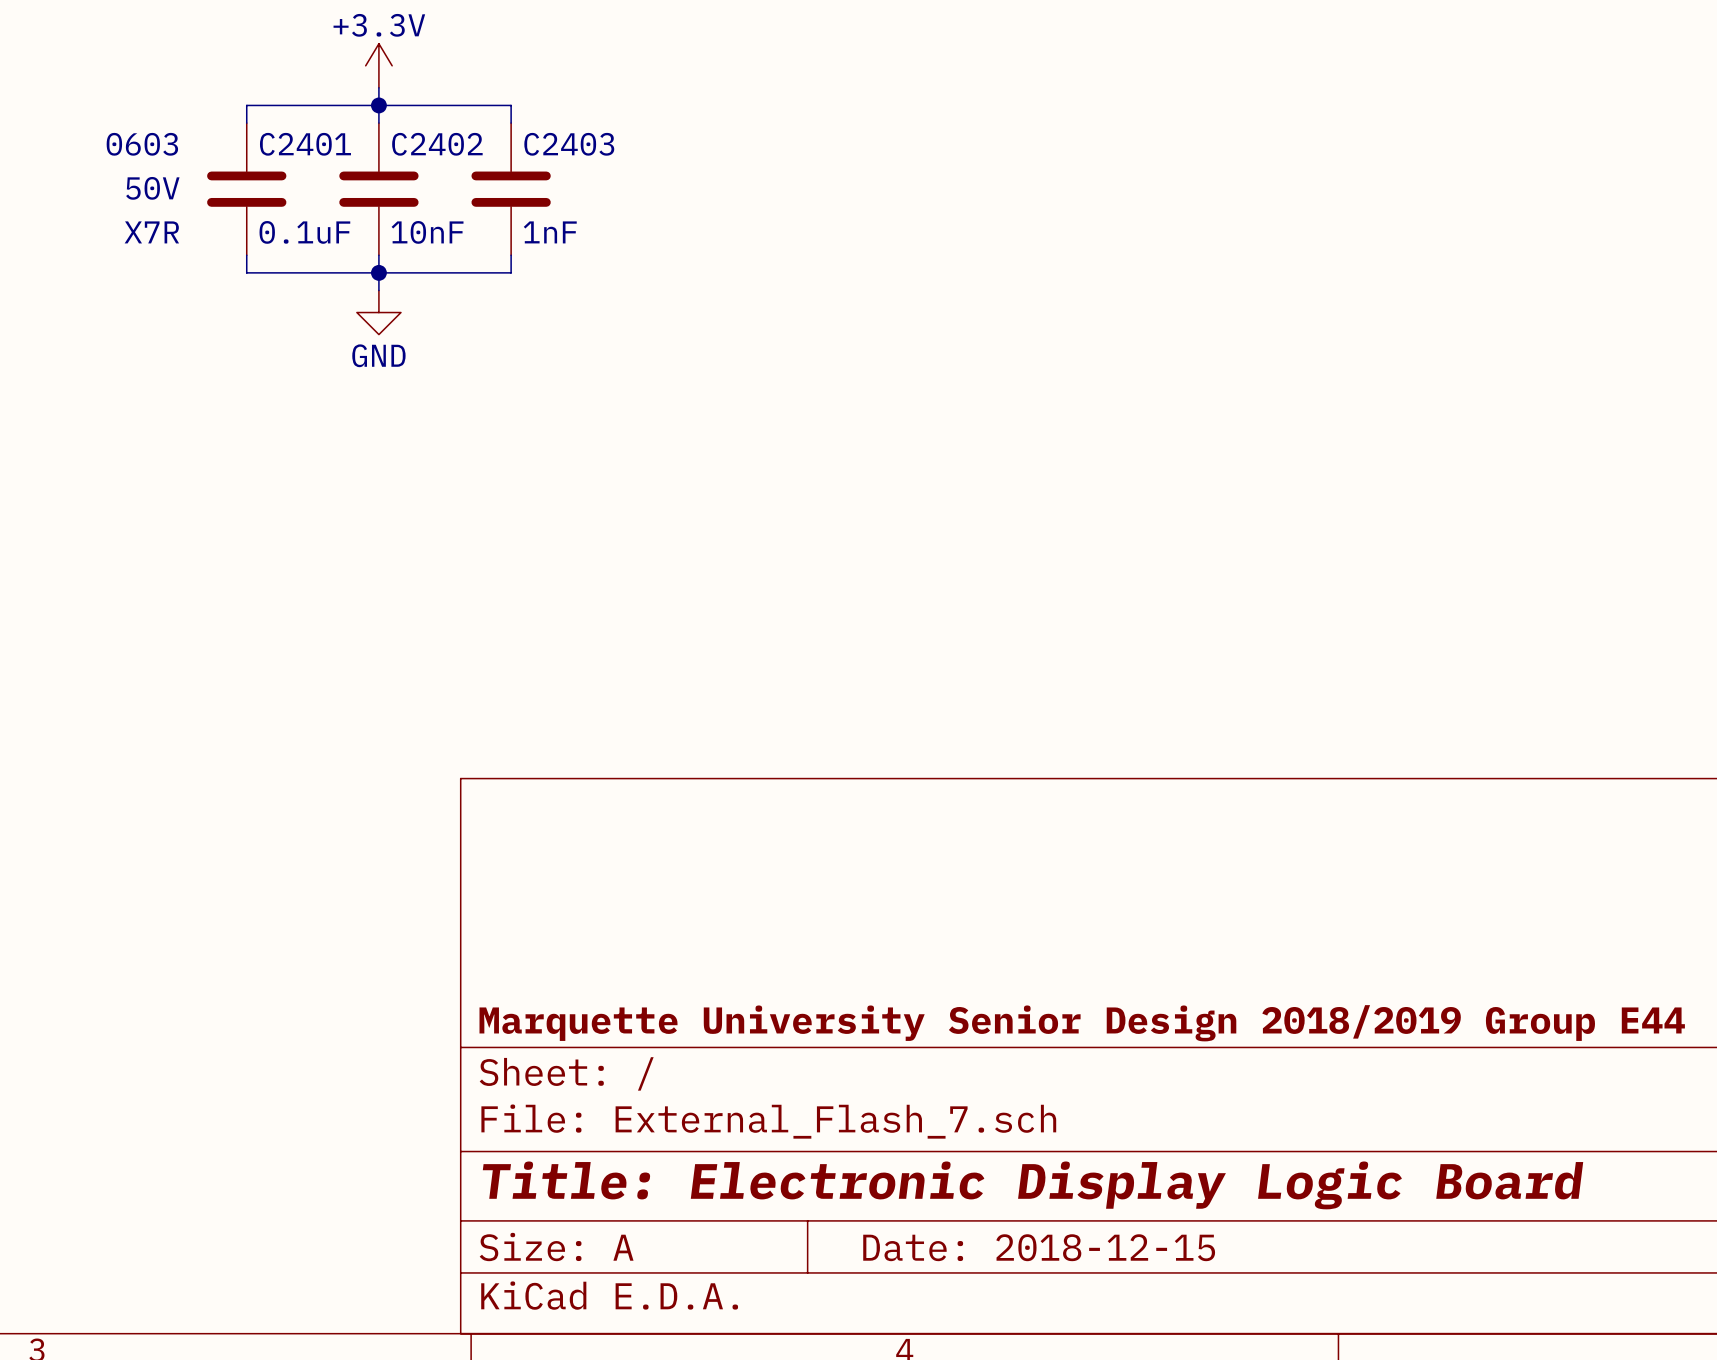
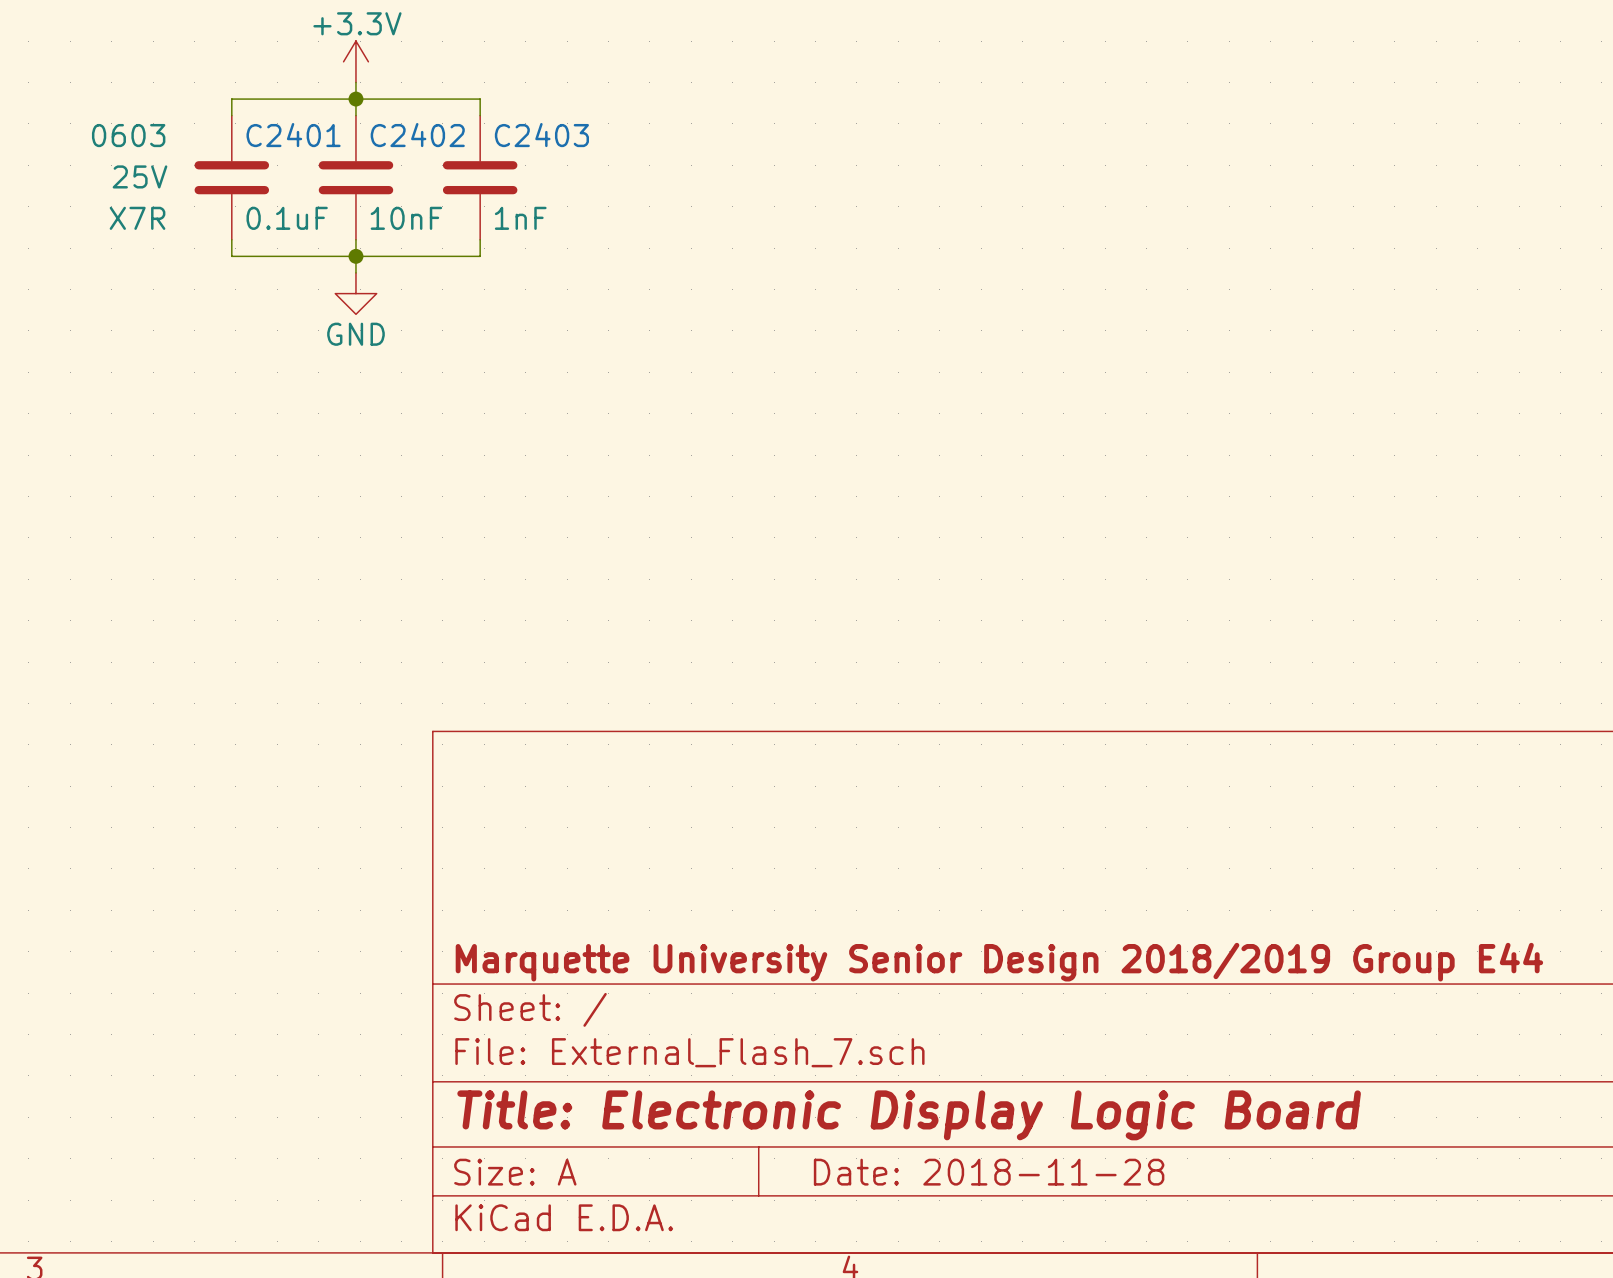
C2401 text: 50V (152, 188) -> 25V (139, 176)
title block: Date: 2018-12-15 (1039, 1247) -> Date: 2018-11-28 (989, 1172)

